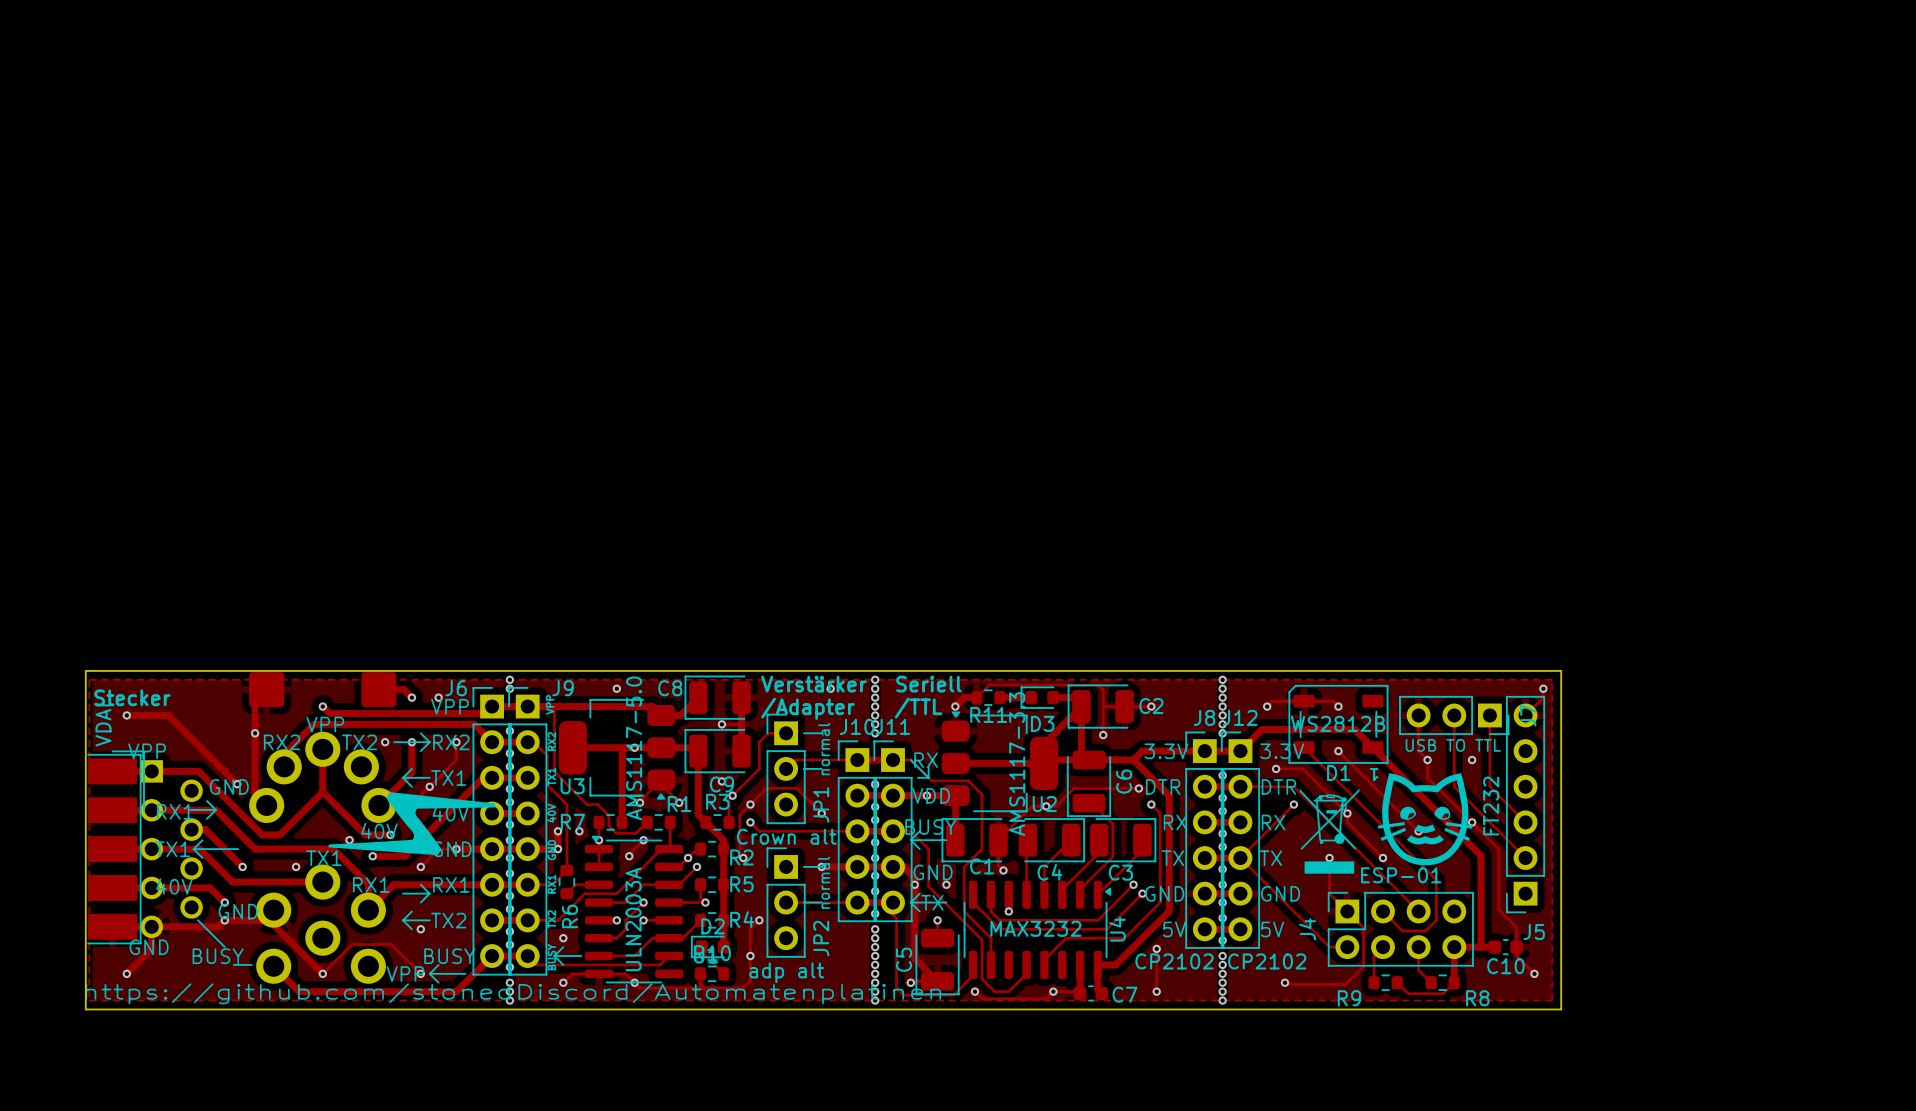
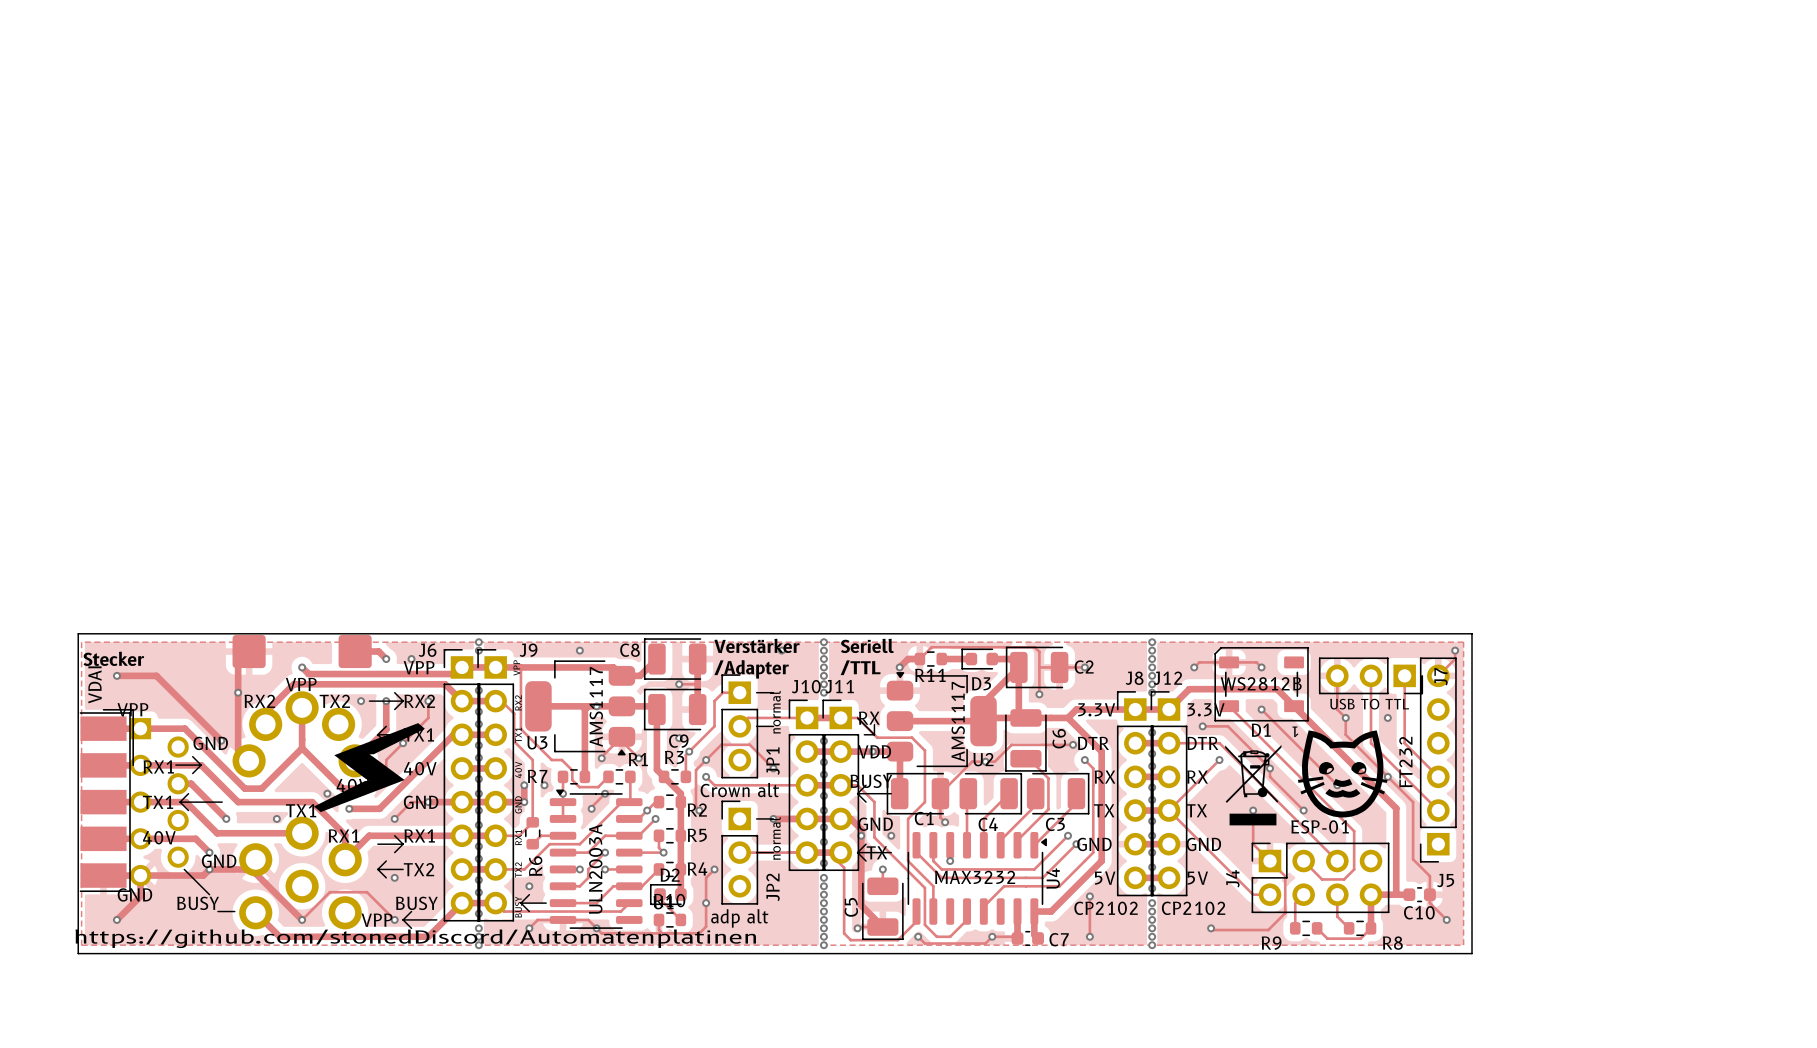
U3 value: AMS1117-5.0 (634, 748) -> AMS1117 (596, 706)
U2 value: AMS1117-3.3 (1017, 764) -> AMS1117 (958, 721)

